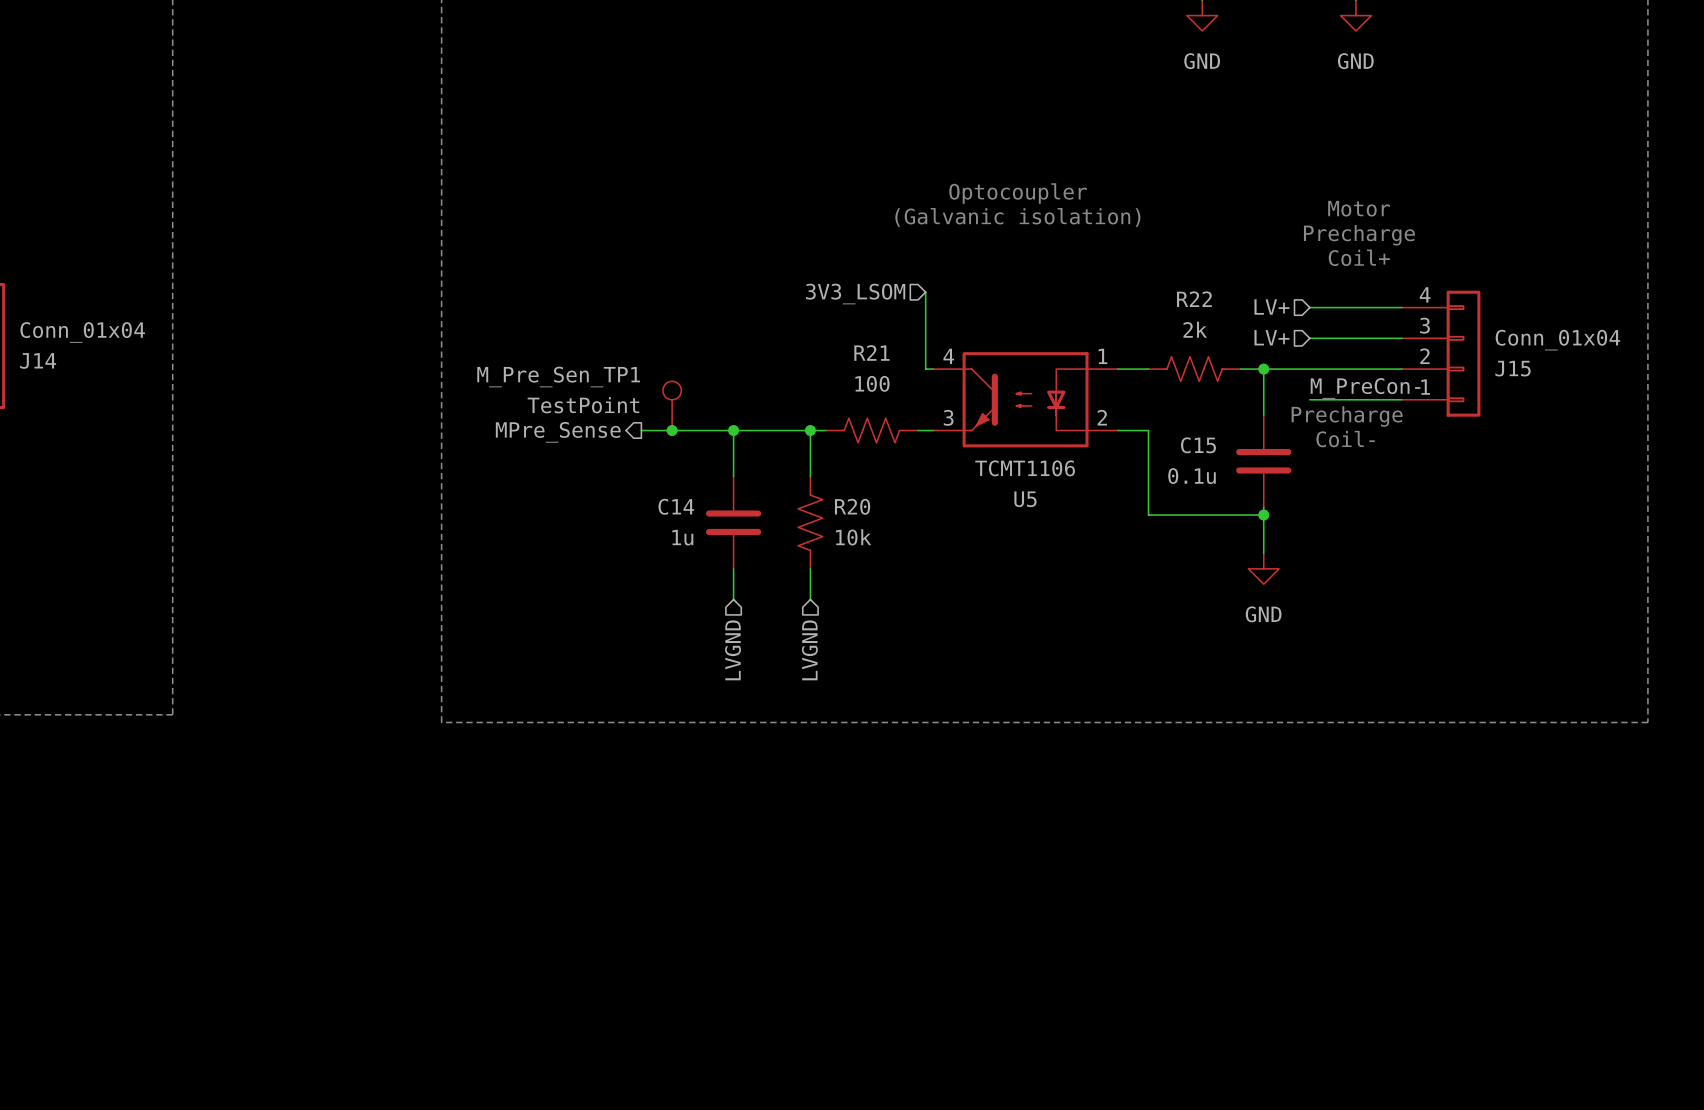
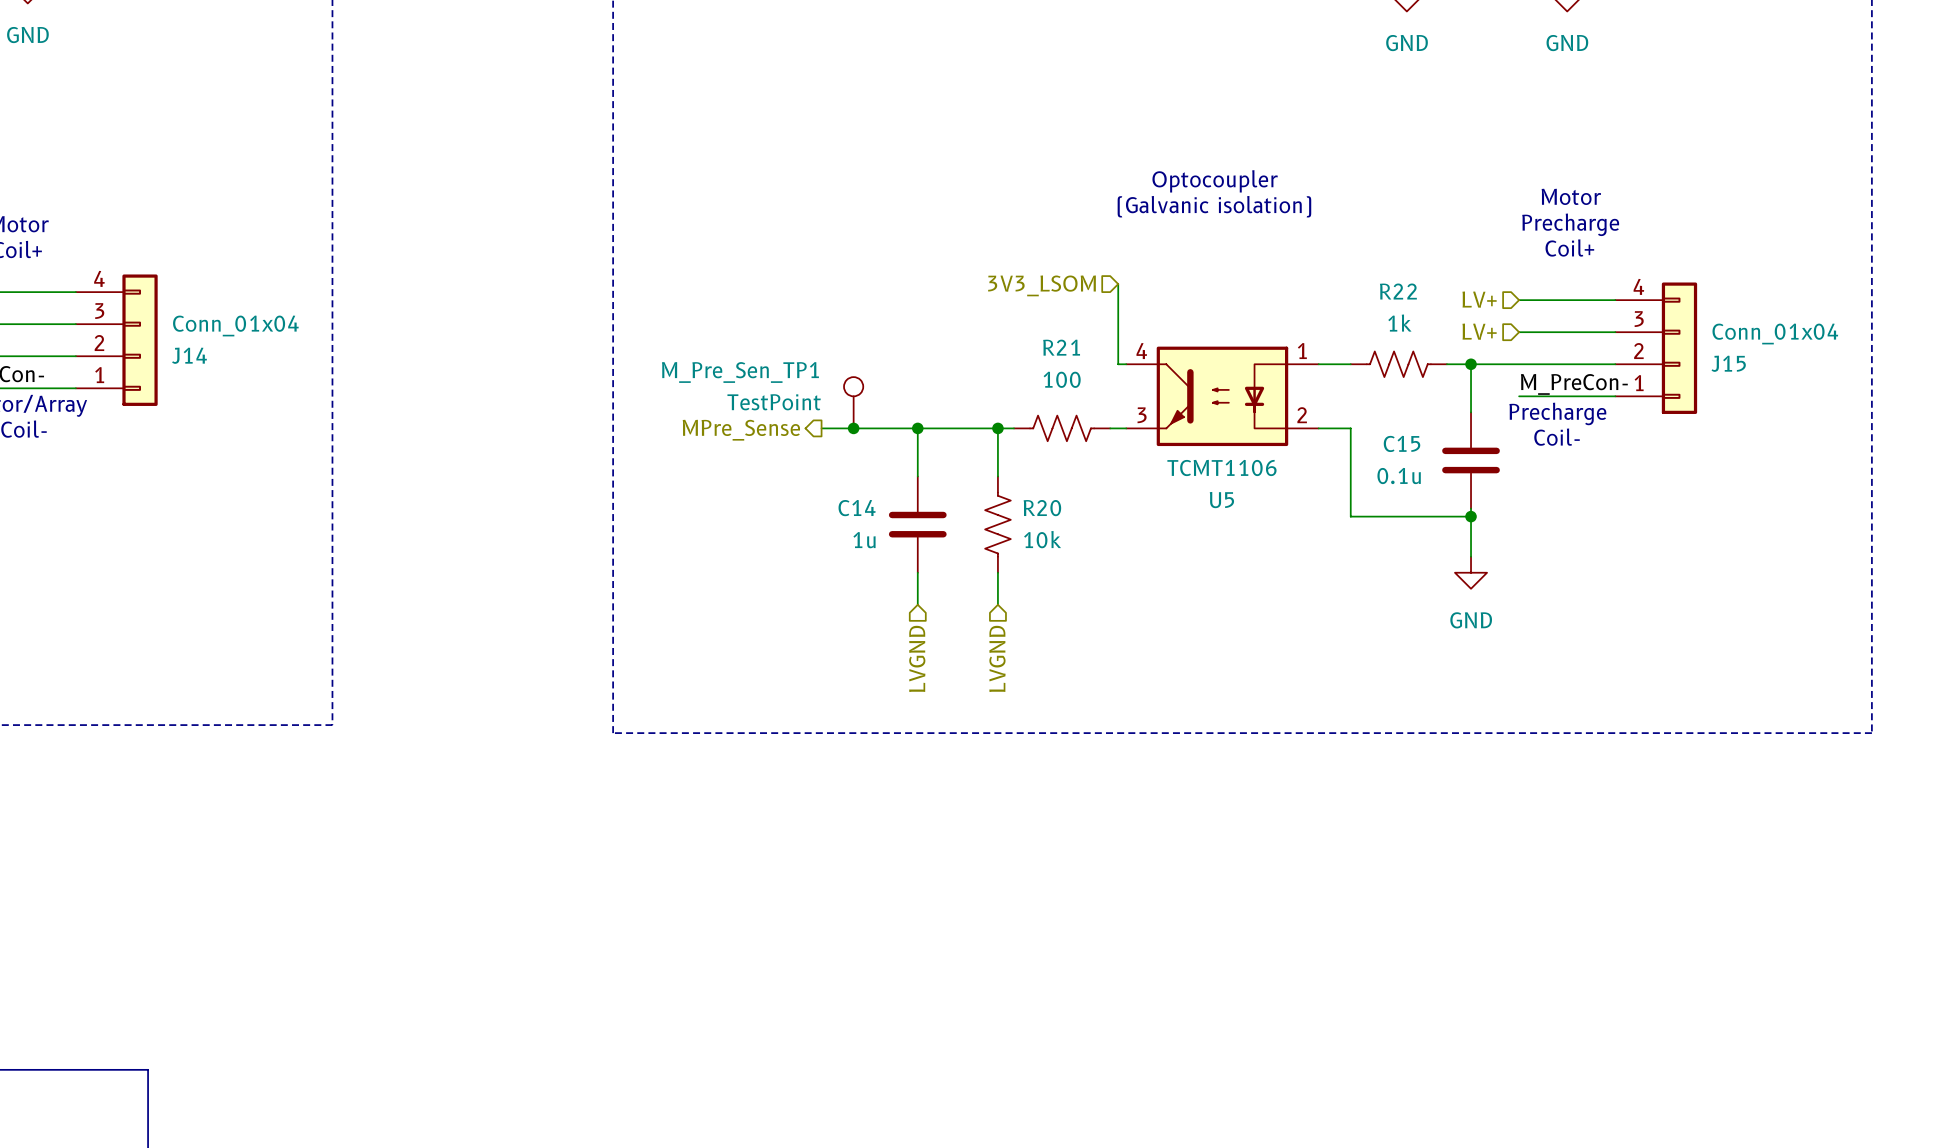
R22 value: 2k (1195, 329) -> 1k (1399, 323)

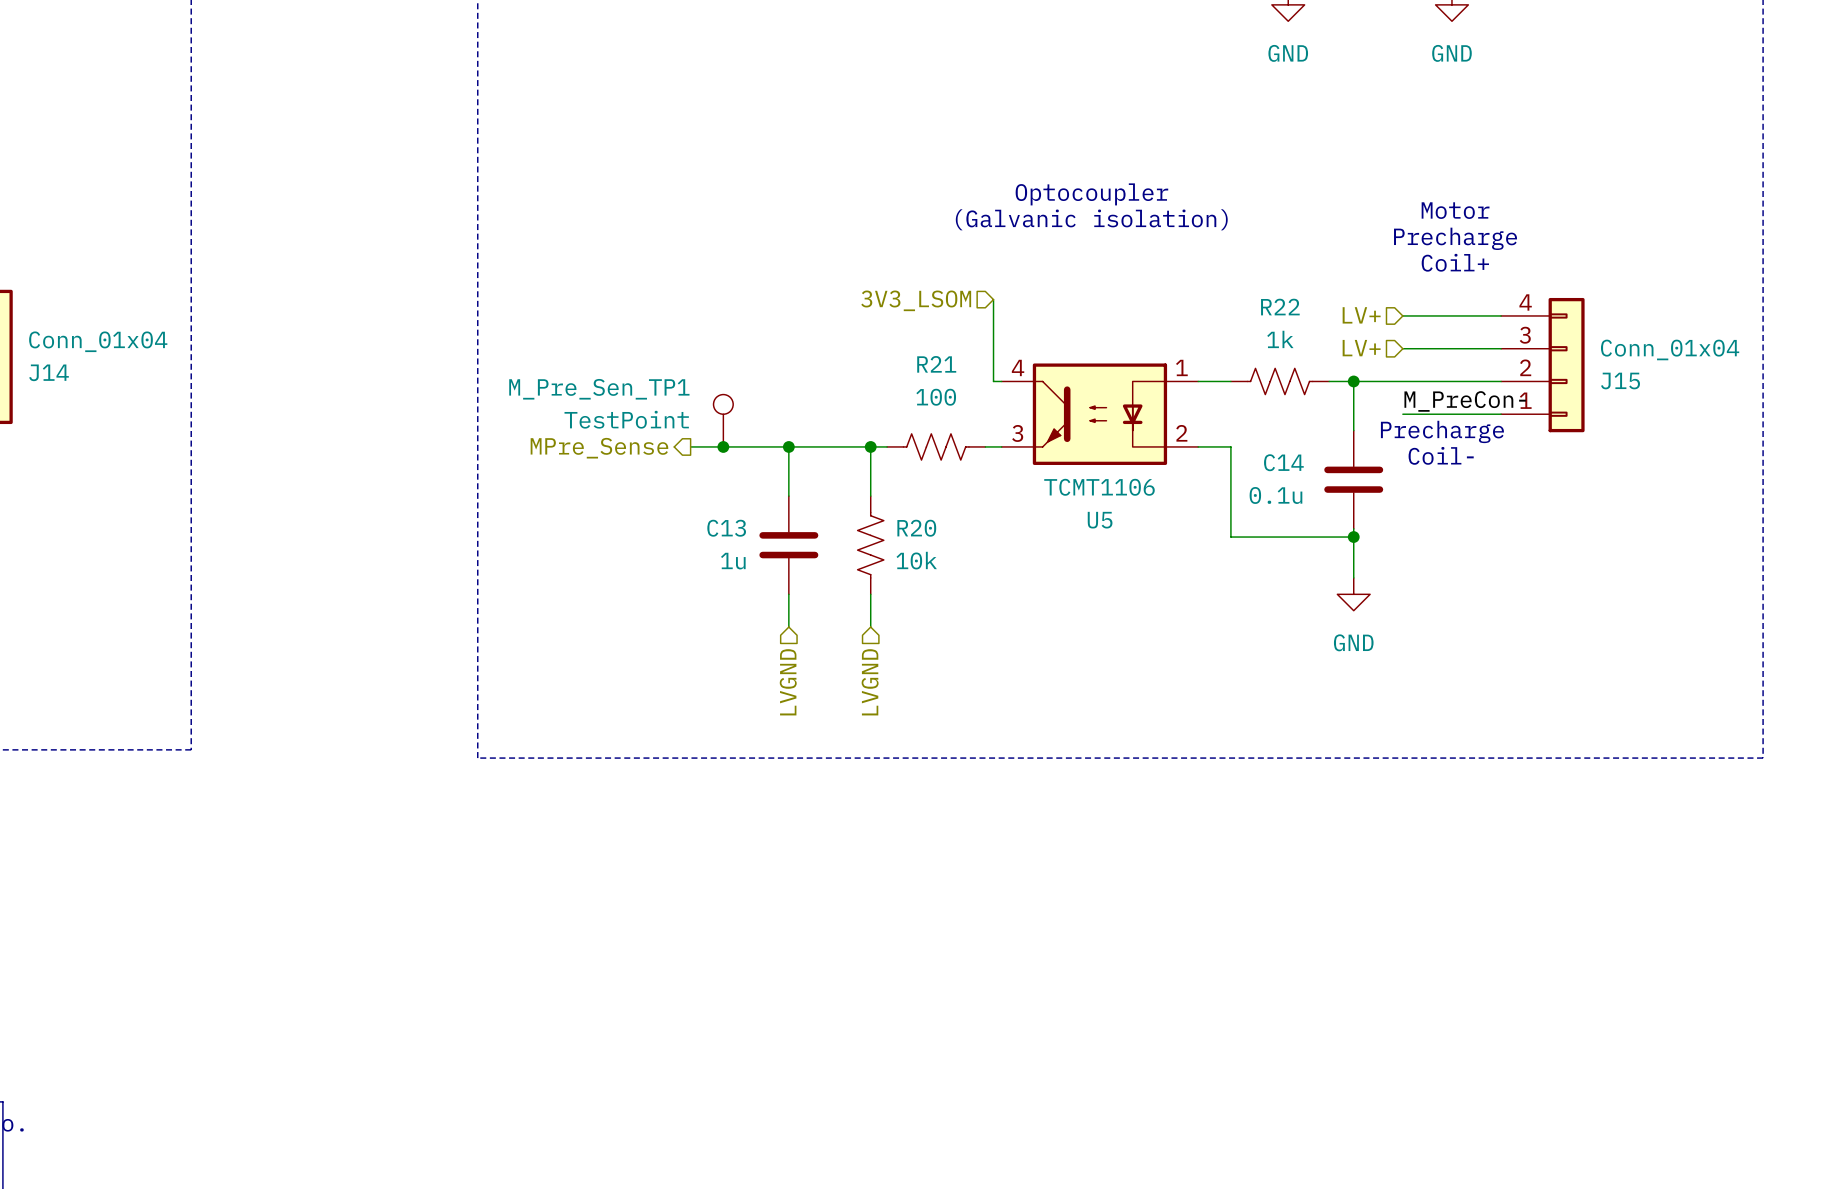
C15 name: C15 (1402, 443) -> C14 (1283, 462)
C14 name: C14 (857, 508) -> C13 (726, 528)

